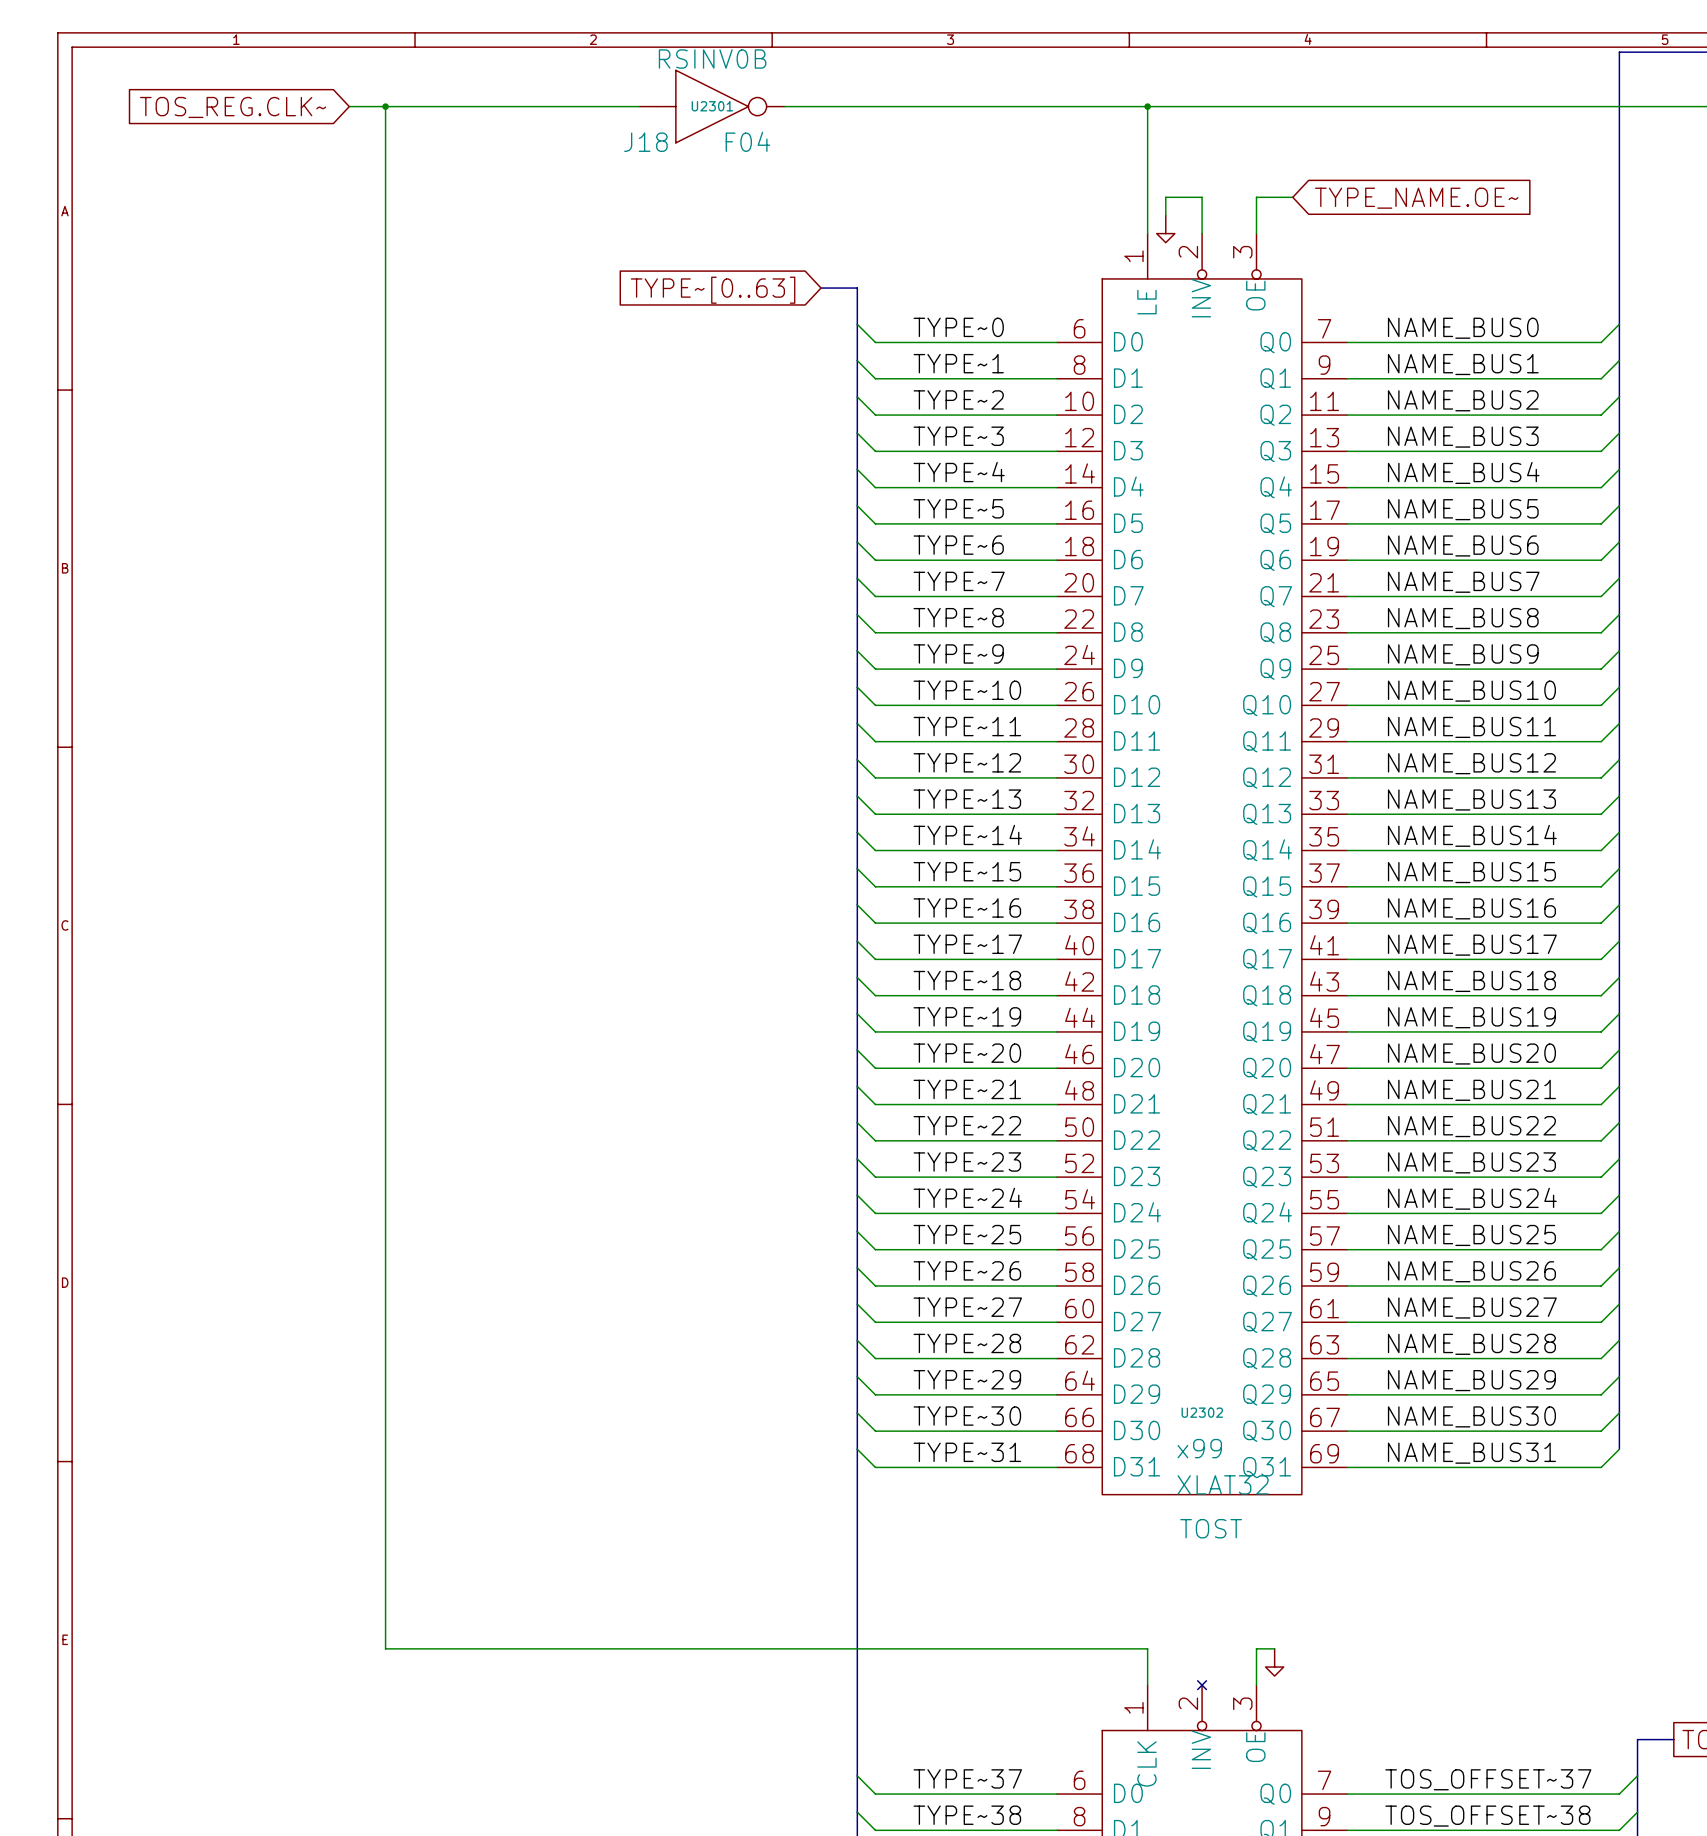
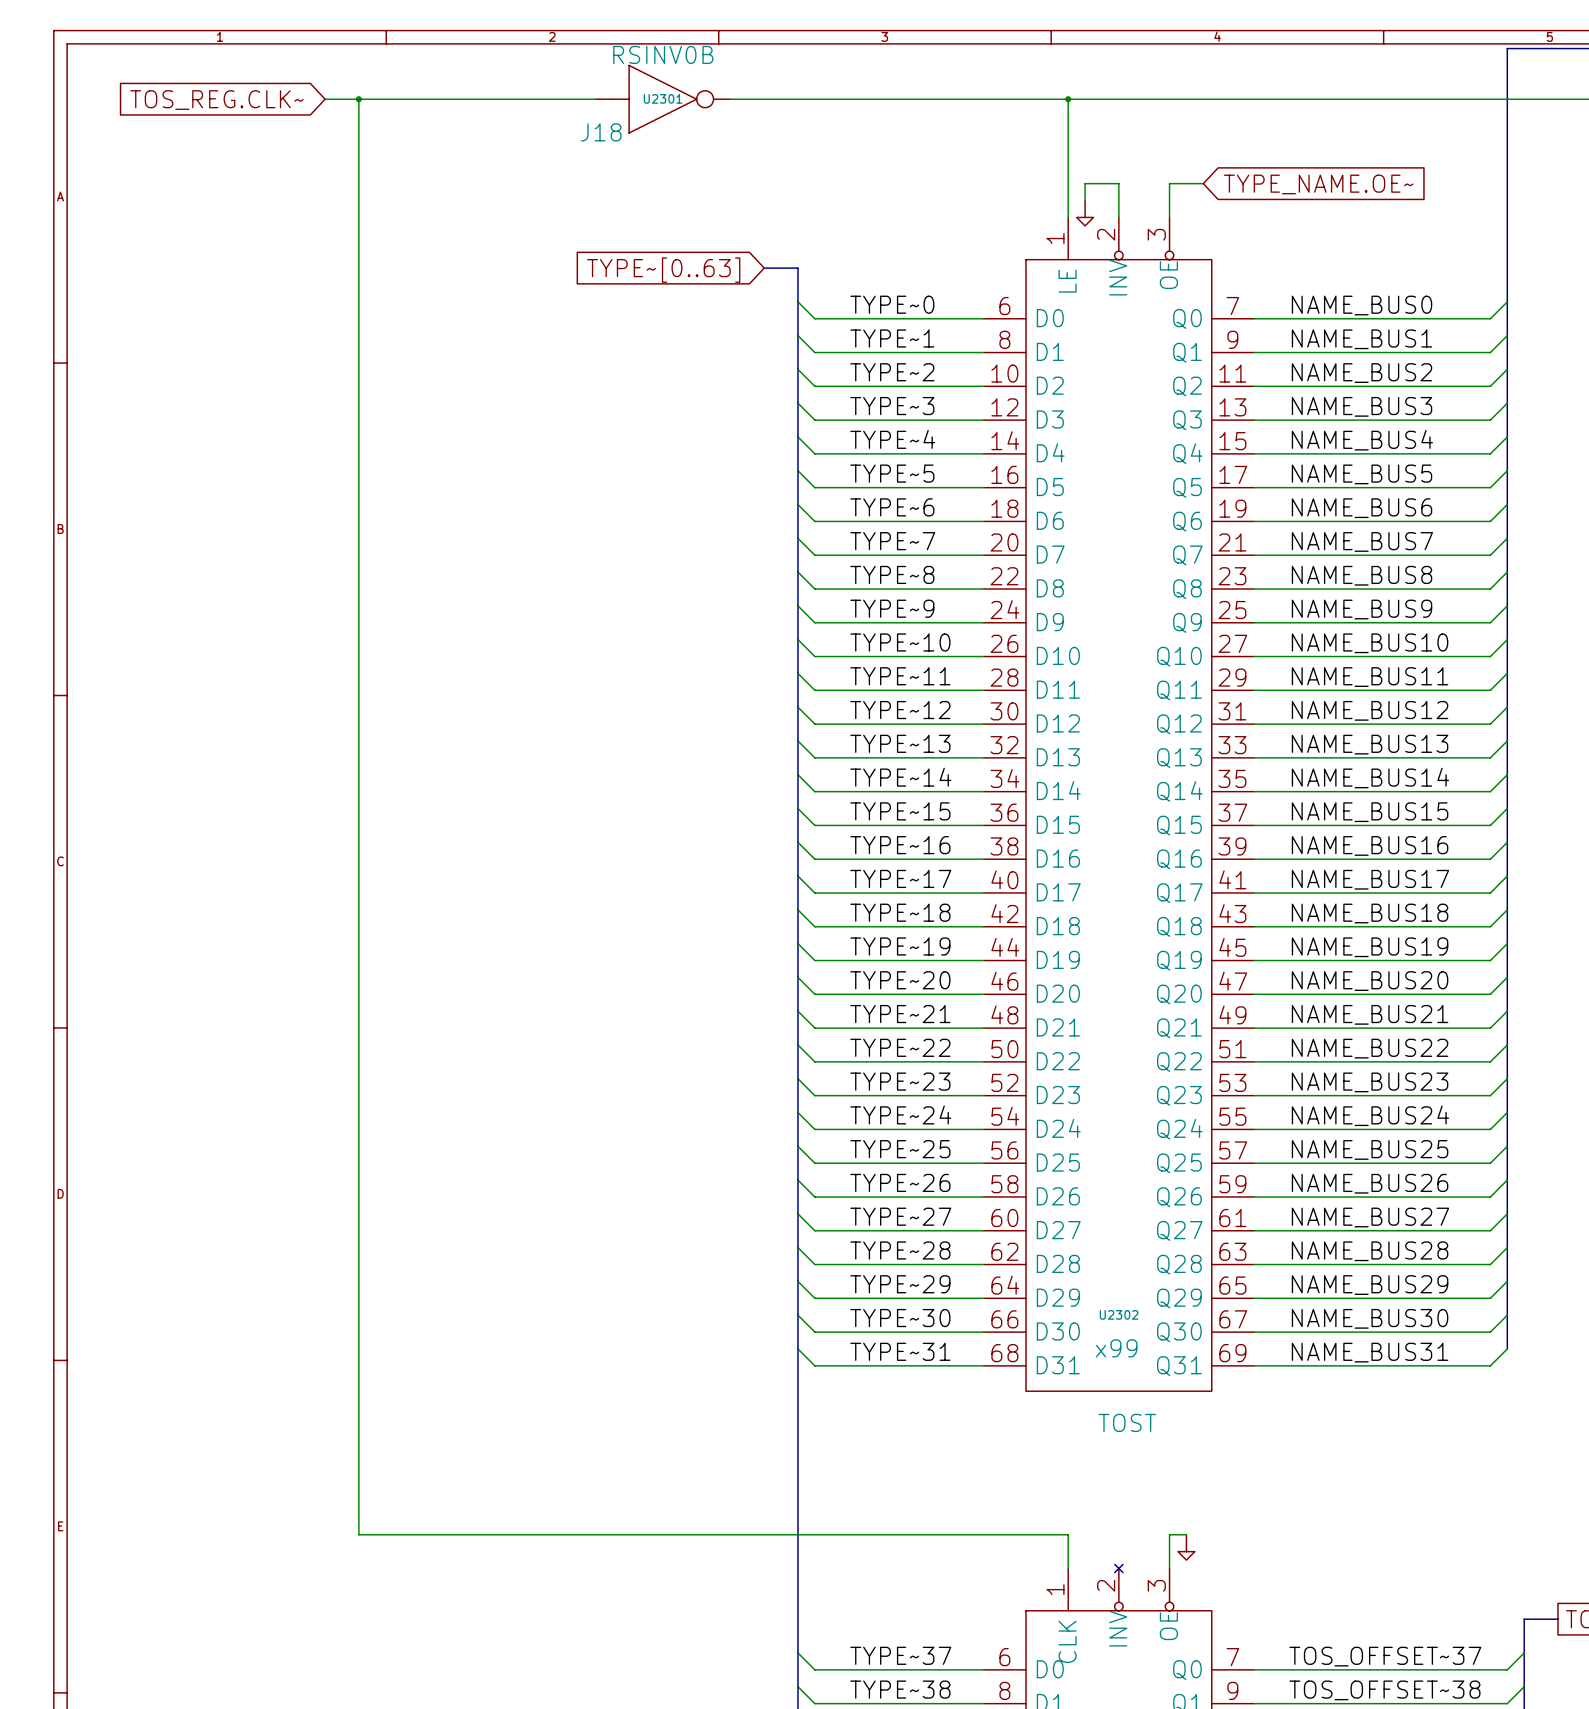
U2301 value: F04 (747, 141) -> none
U2302 value: XLAT32 (1223, 1484) -> none

